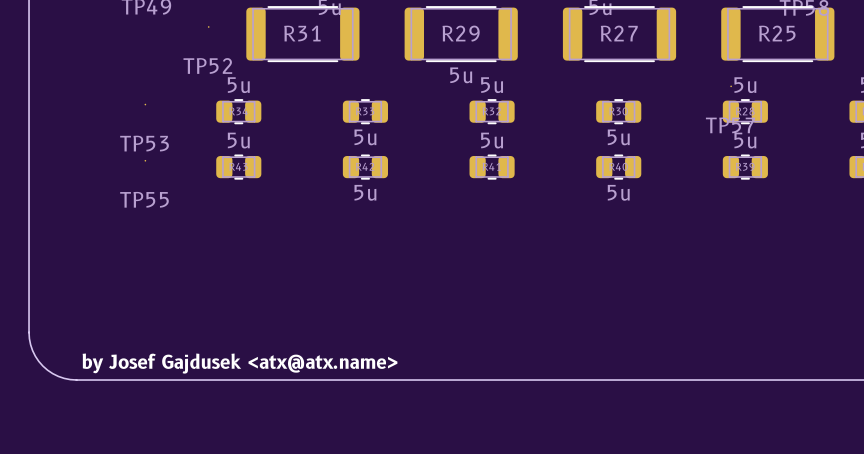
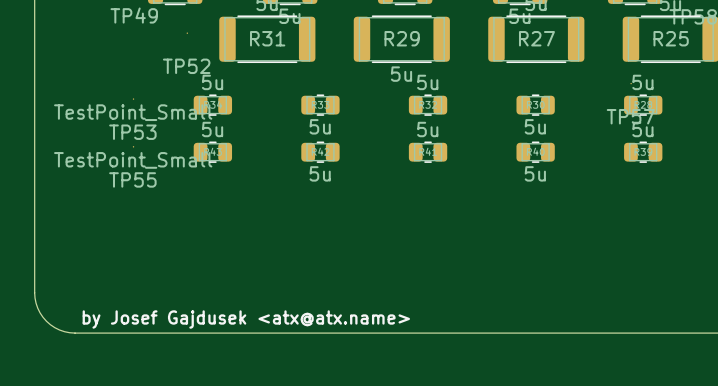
TP53 value: none -> TestPoint_Small (133, 112)
TP55 value: none -> TestPoint_Small (133, 160)

